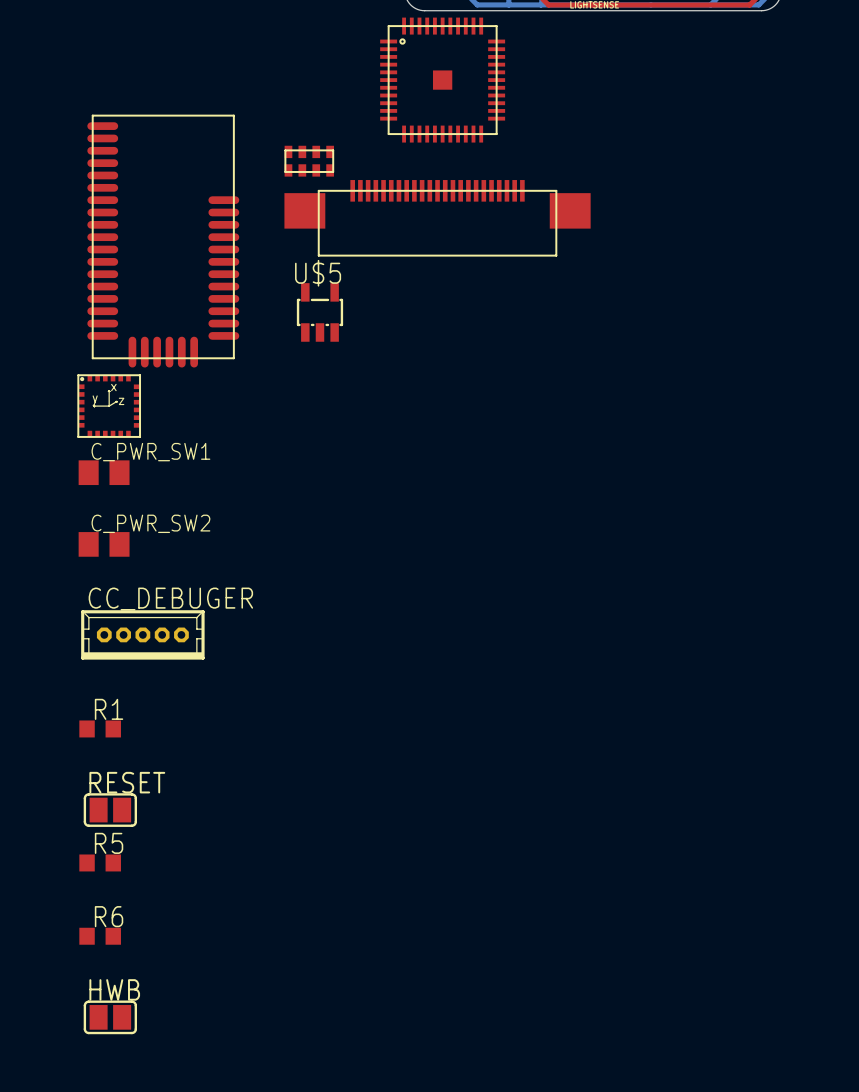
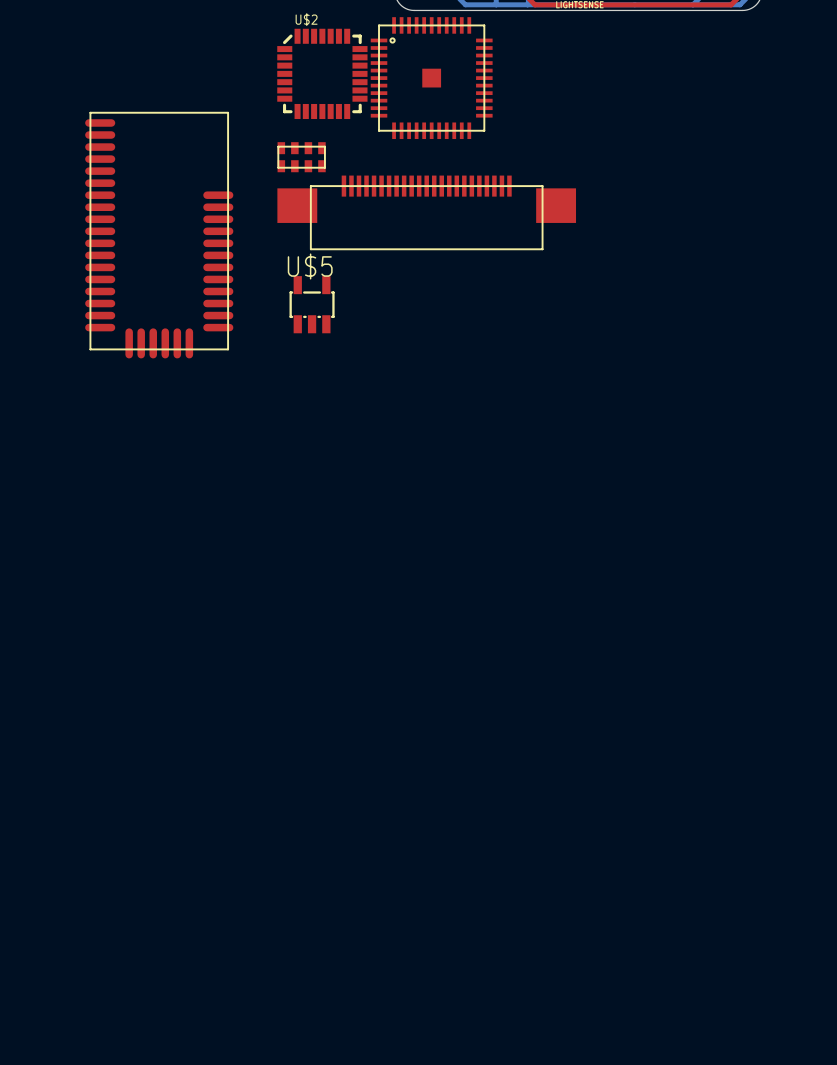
U$2: none -> (322, 73)
part: (109, 406) -> none
C_PWR_SW1: (104, 472) -> none
C_PWR_SW2: (104, 544) -> none
CC_DEBUGER: (142, 634) -> none
R1: (100, 728) -> none
RESET: (110, 810) -> none
R5: (100, 862) -> none
R6: (100, 936) -> none
HWB: (110, 1017) -> none

